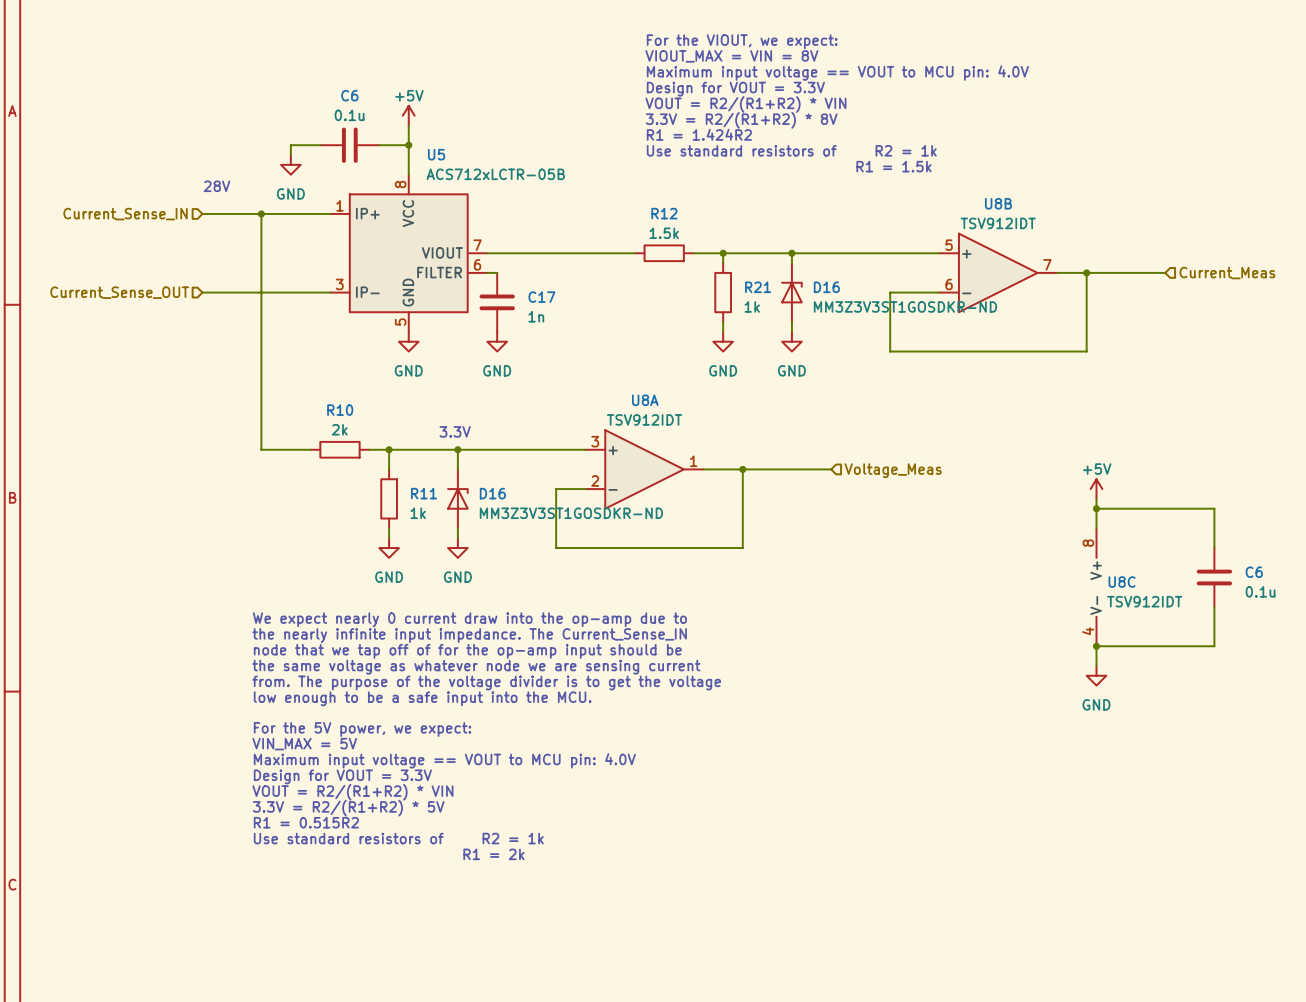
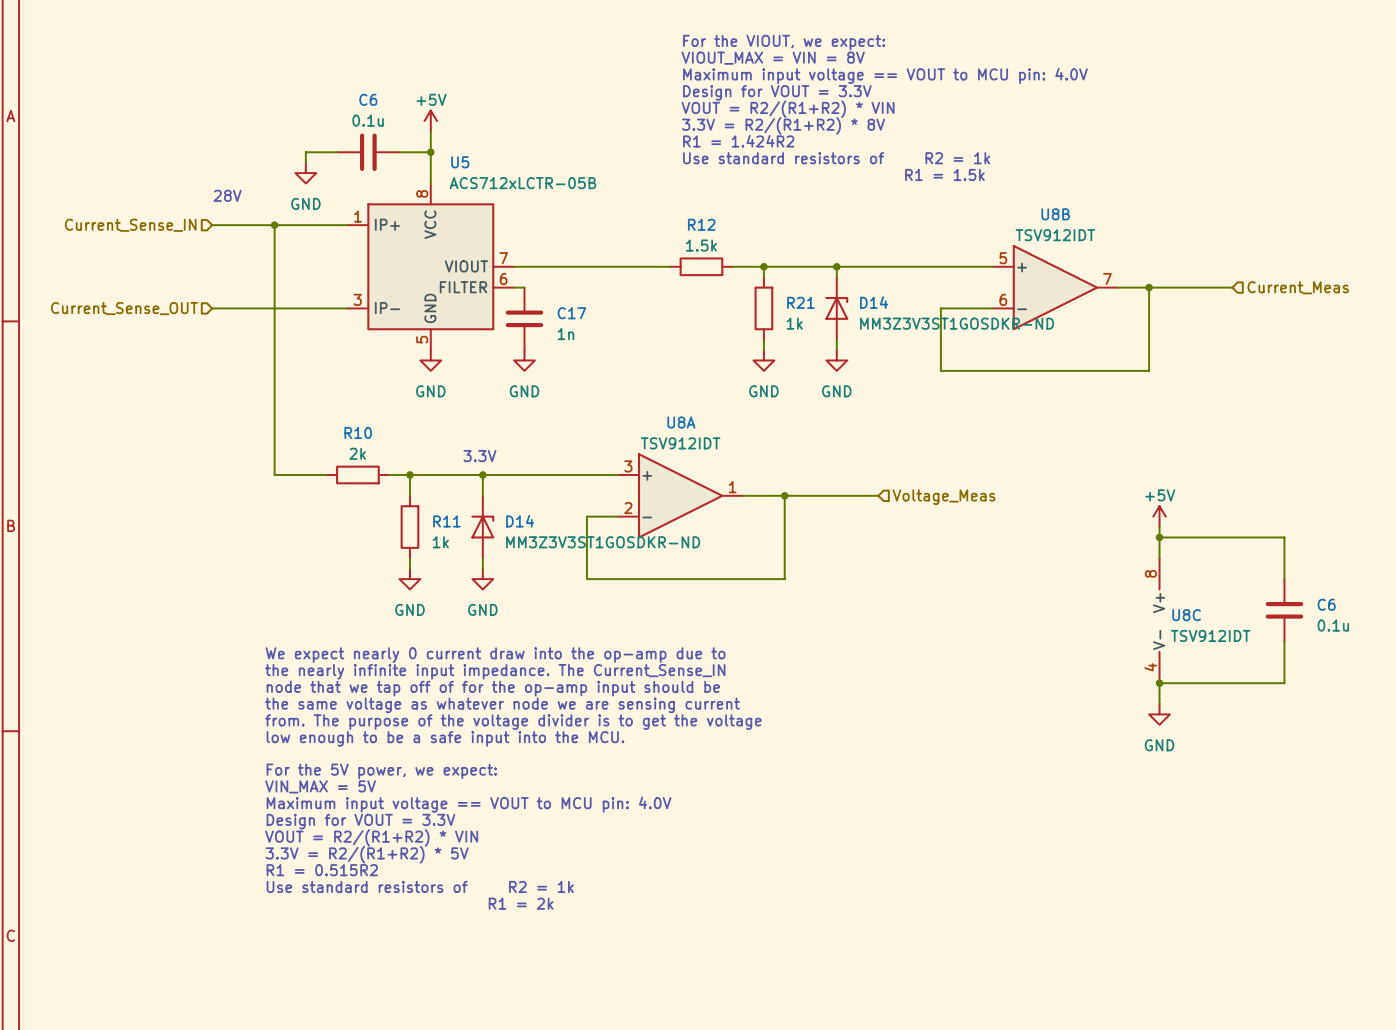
D16 name: D16 (826, 287) -> D14 (874, 302)
D16 name: D16 (492, 493) -> D14 (520, 521)

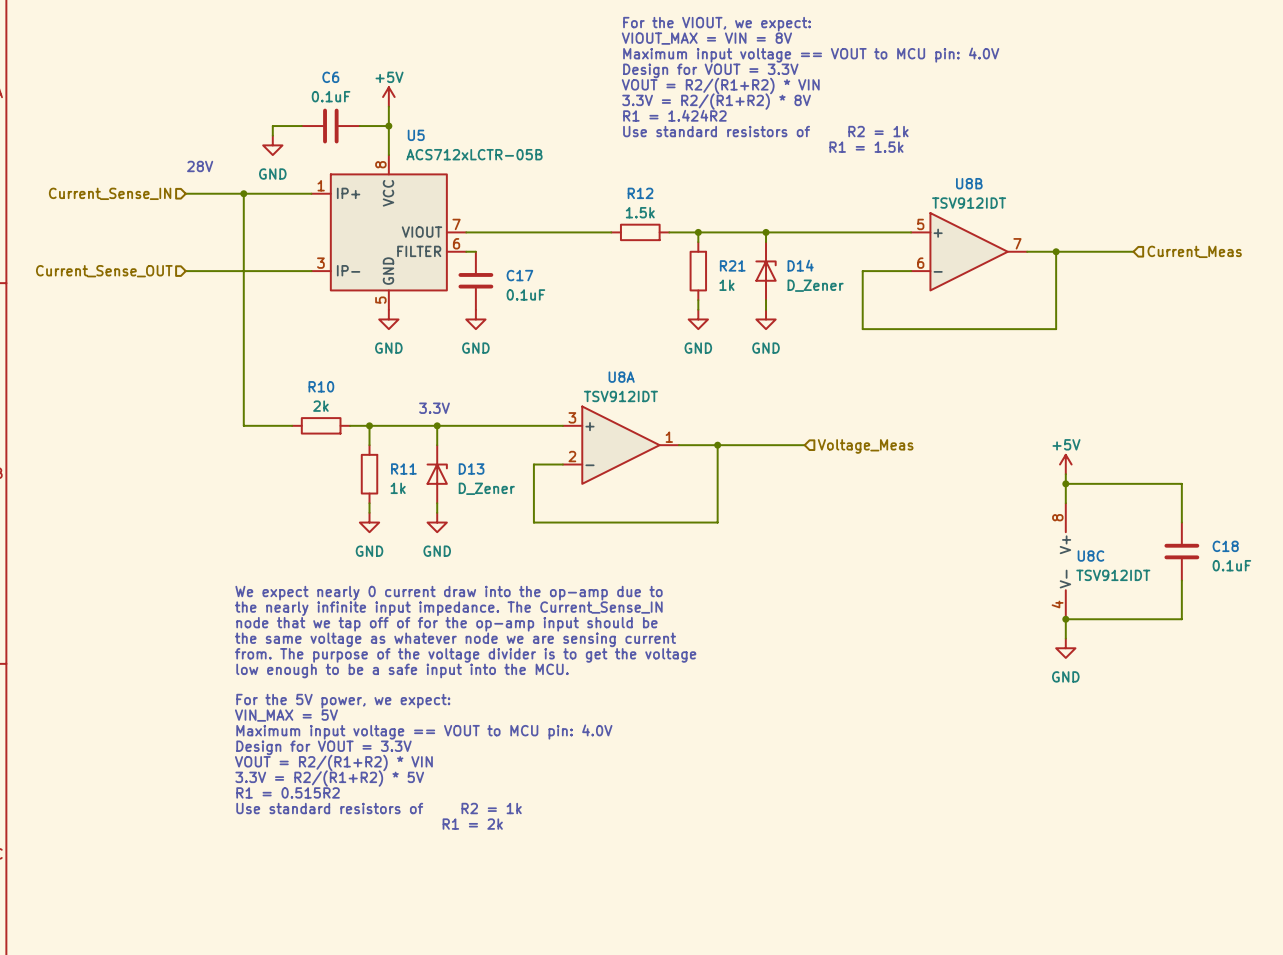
C6 value: 0.1u (368, 120) -> 0.1uF (331, 96)
D14 value: MM3Z3V3ST1GOSDKR-ND (957, 323) -> D_Zener (815, 285)
C17 value: 1n (565, 334) -> 0.1uF (525, 294)
D14 name: D14 (520, 521) -> D13 (471, 468)
D14 value: MM3Z3V3ST1GOSDKR-ND (603, 542) -> D_Zener (486, 488)
C6 name: C6 (1326, 604) -> C18 (1225, 546)
C6 value: 0.1u (1333, 625) -> 0.1uF (1231, 565)

